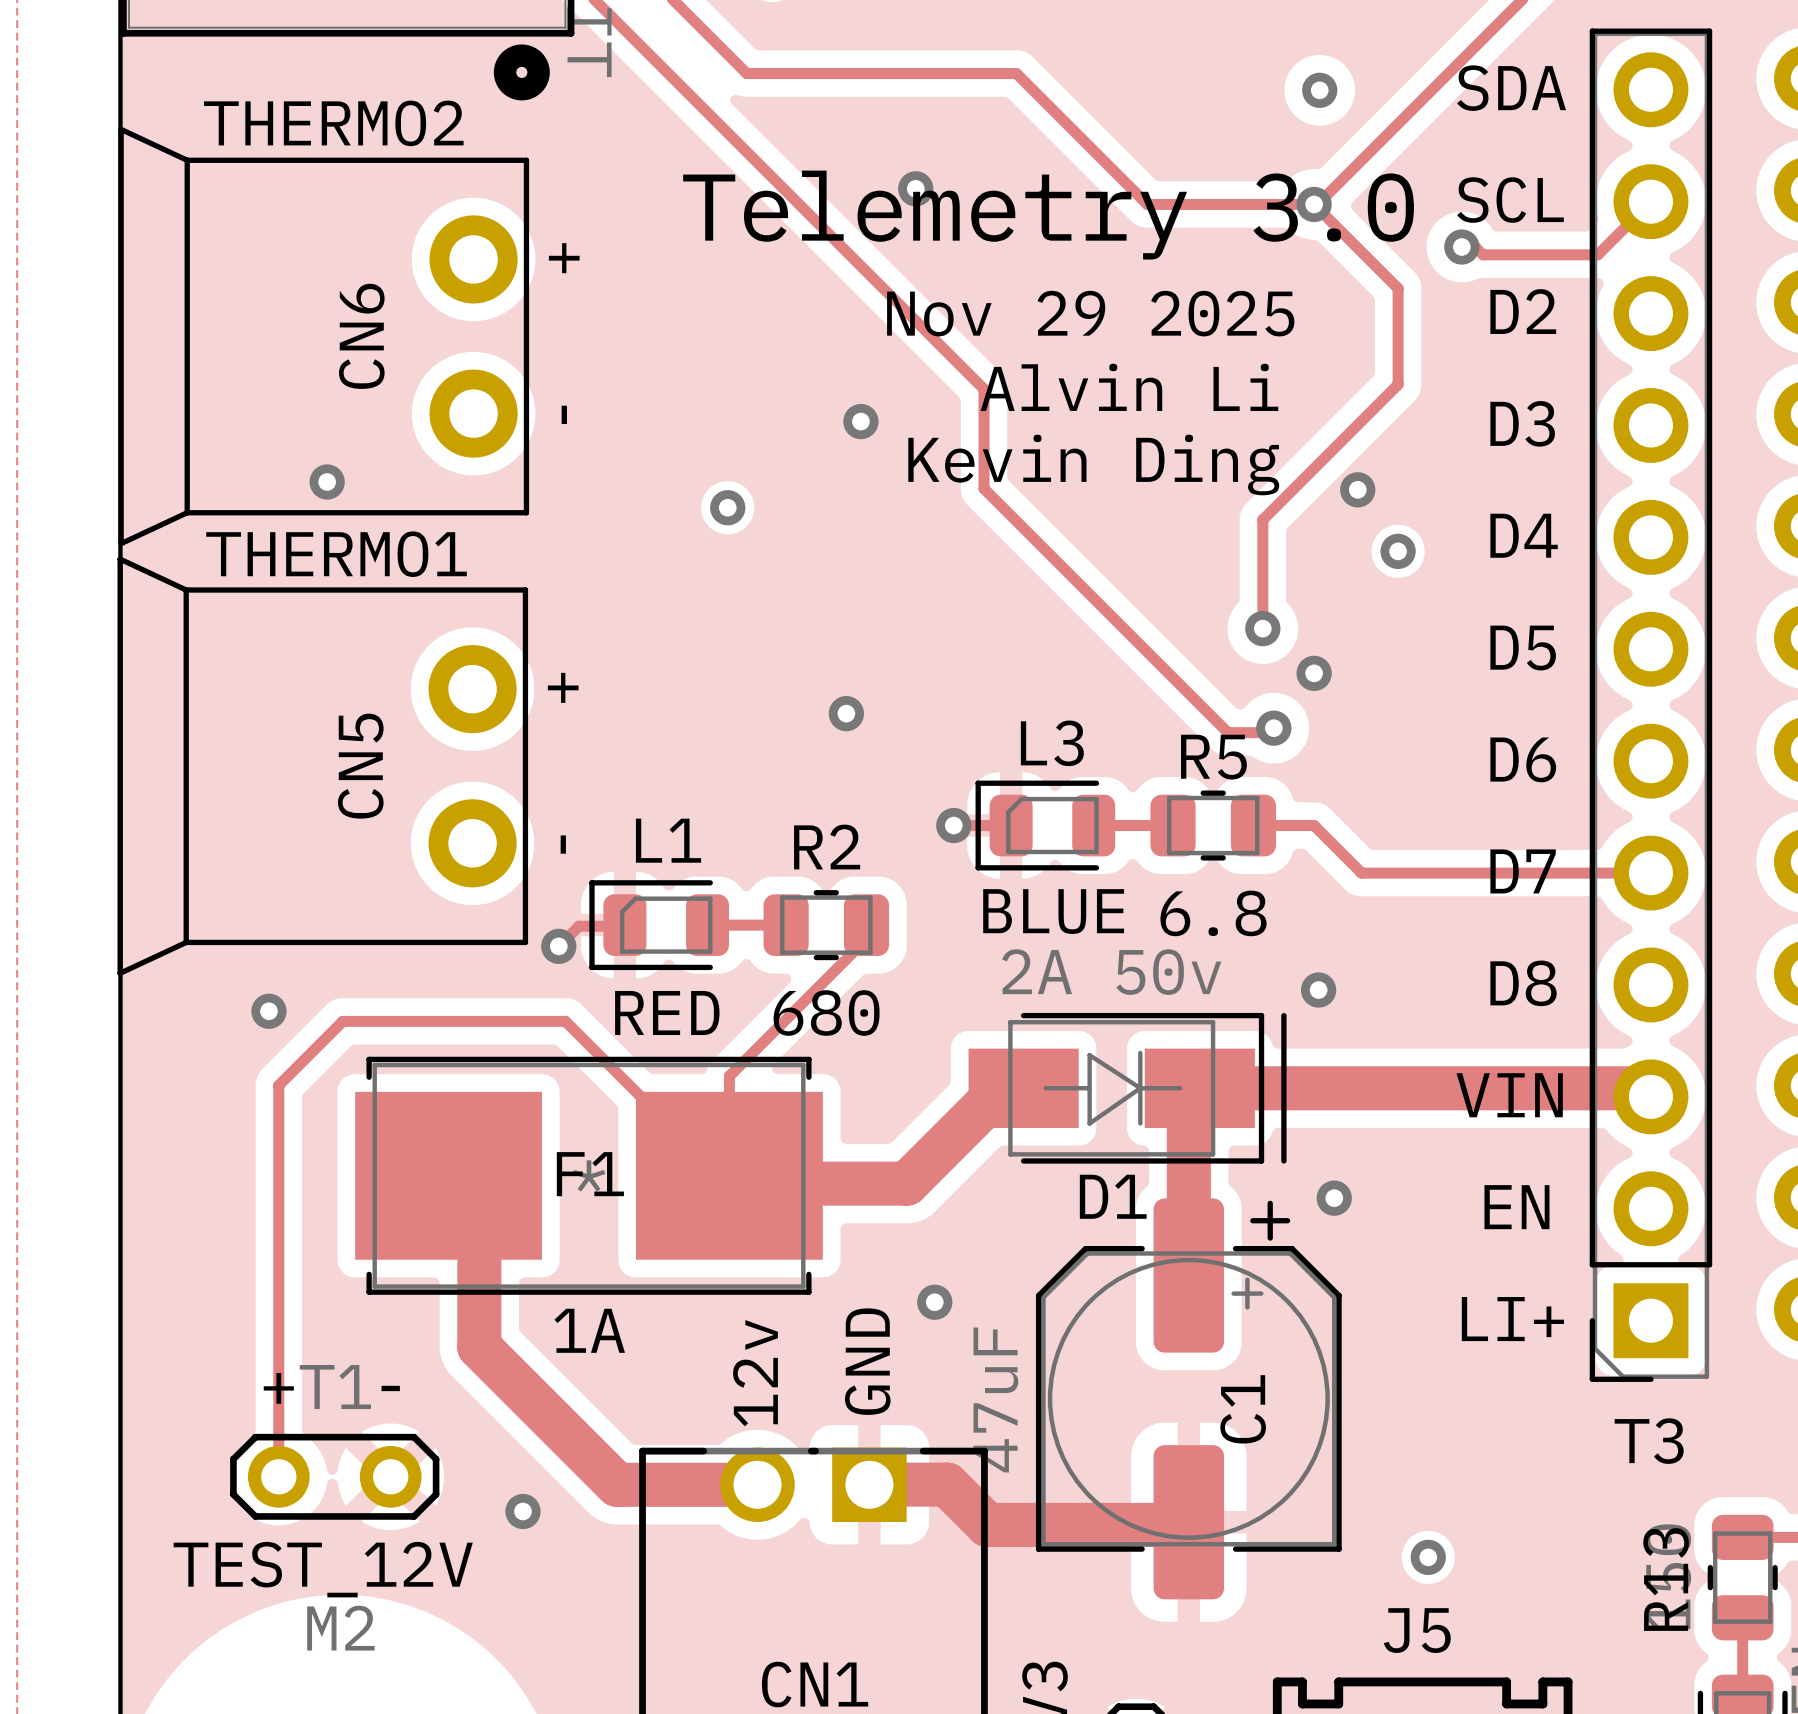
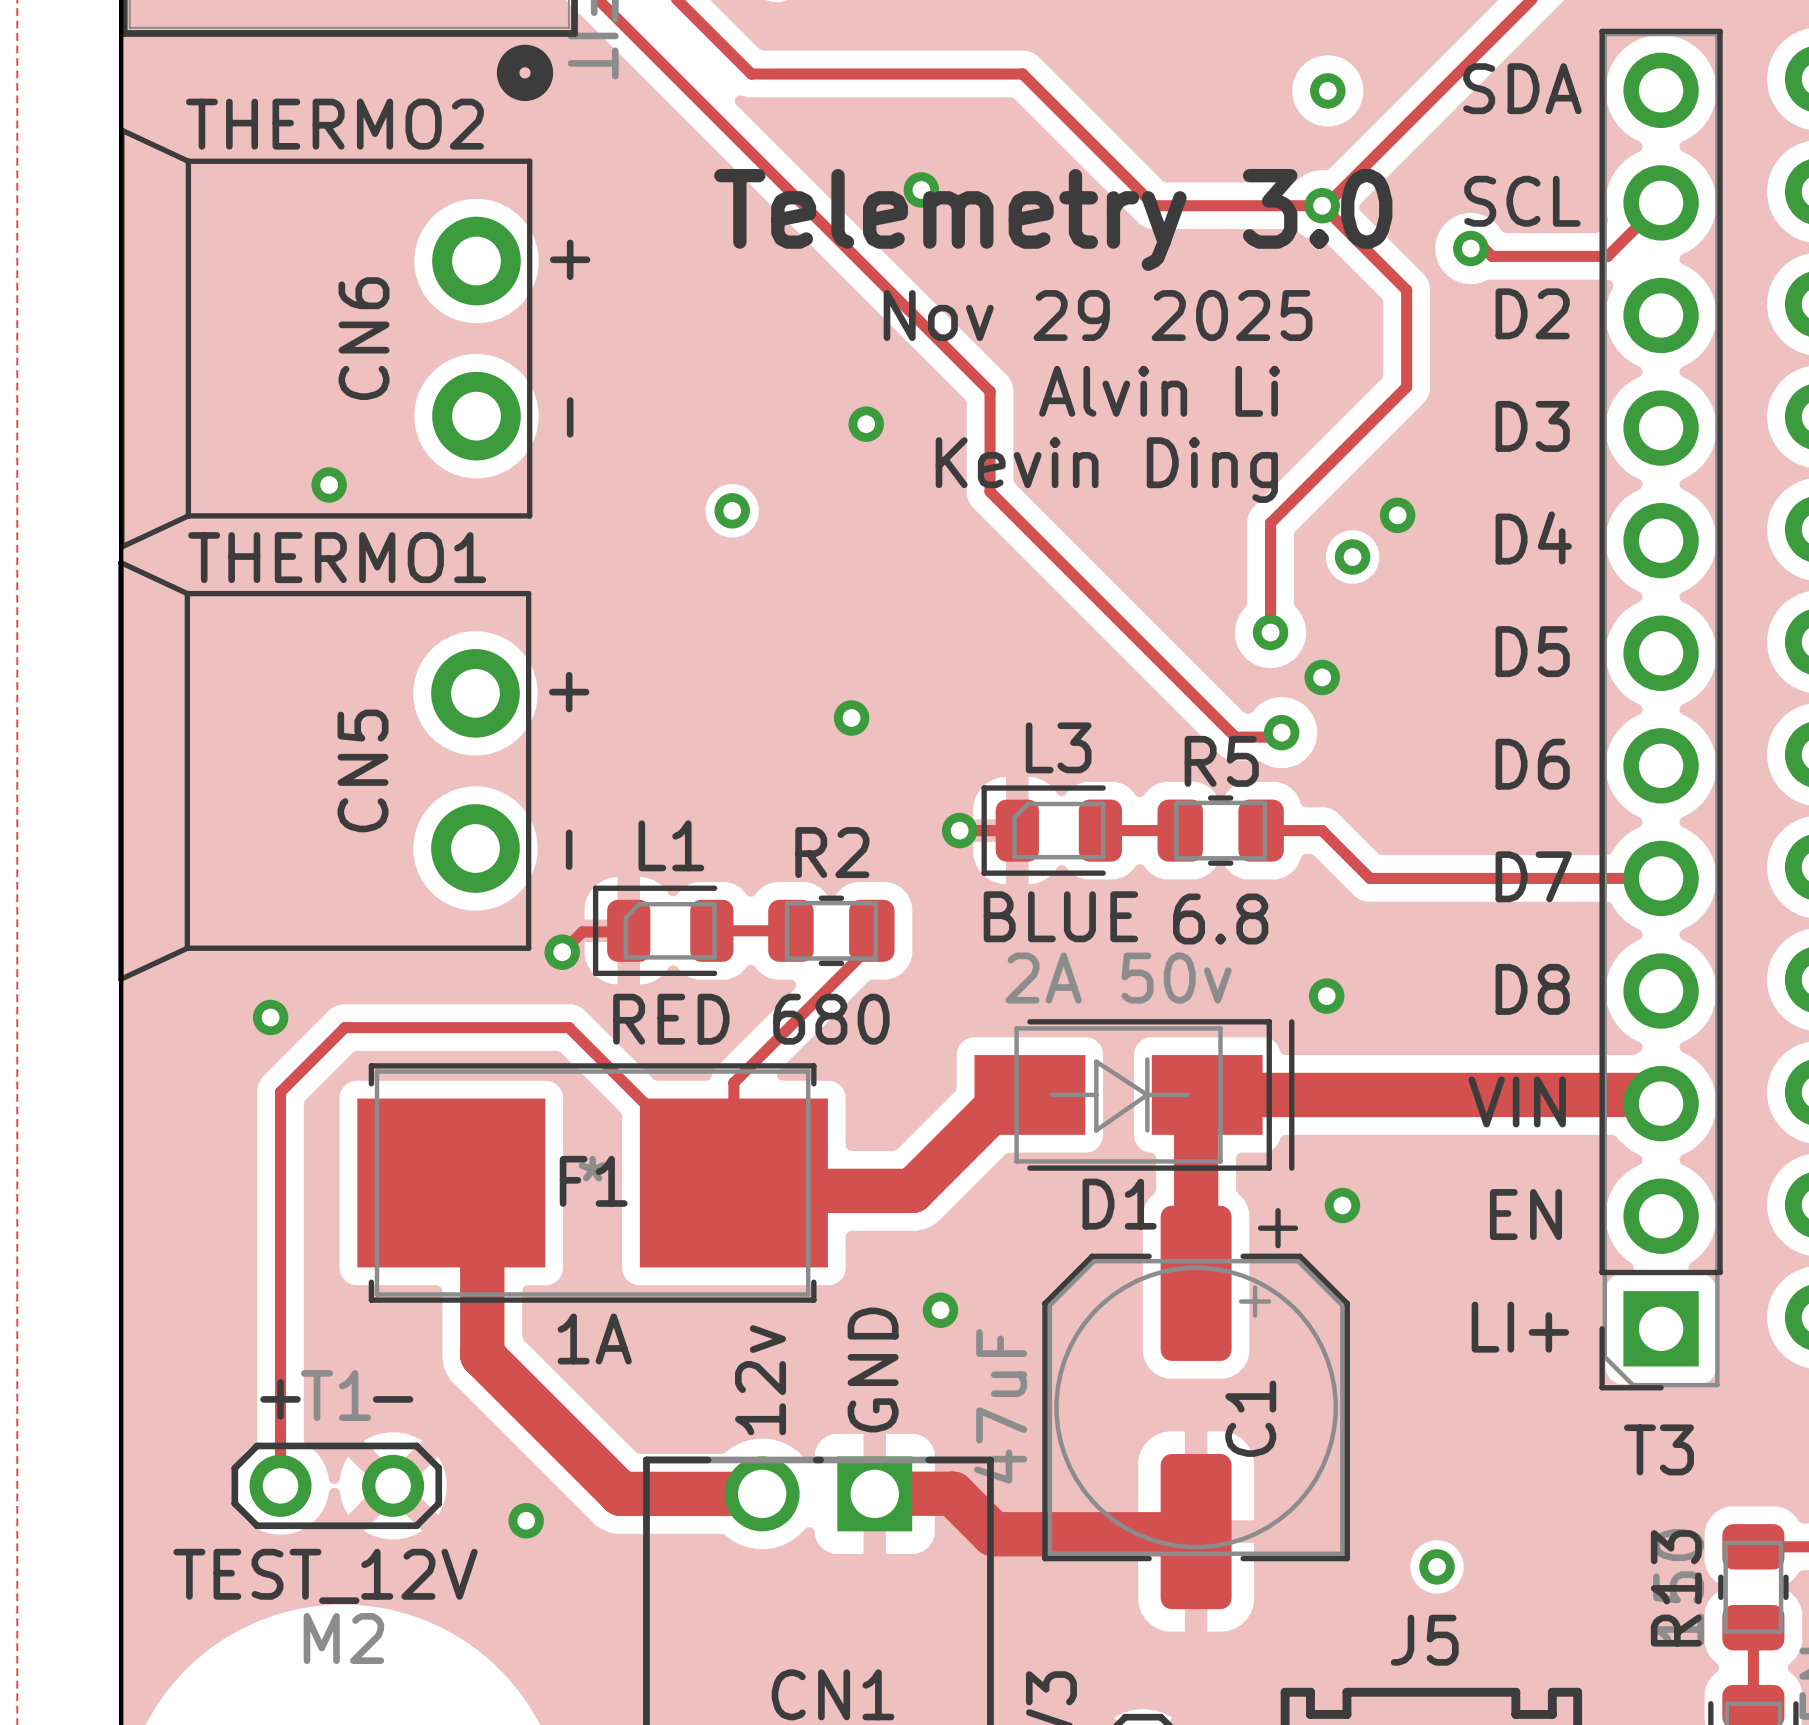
via position: (1357, 489) -> (1397, 515)
via: (1398, 551) -> none
via: none -> (1352, 557)

